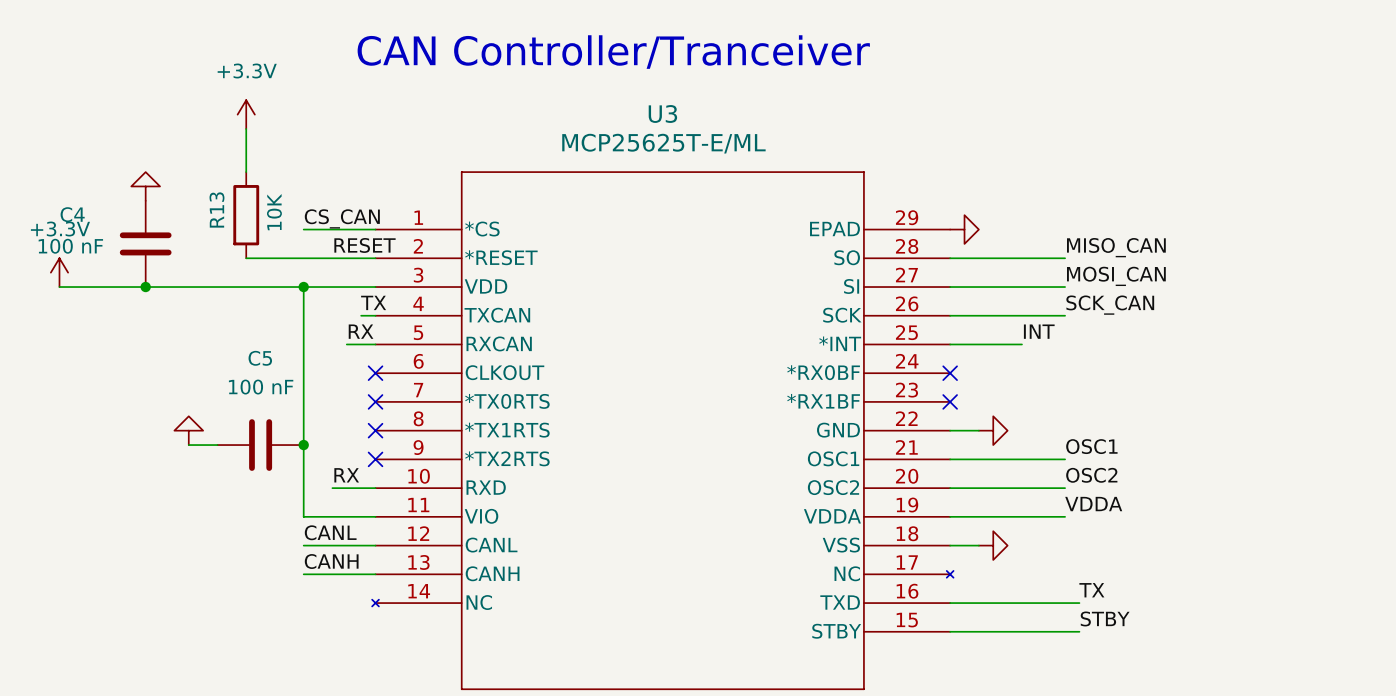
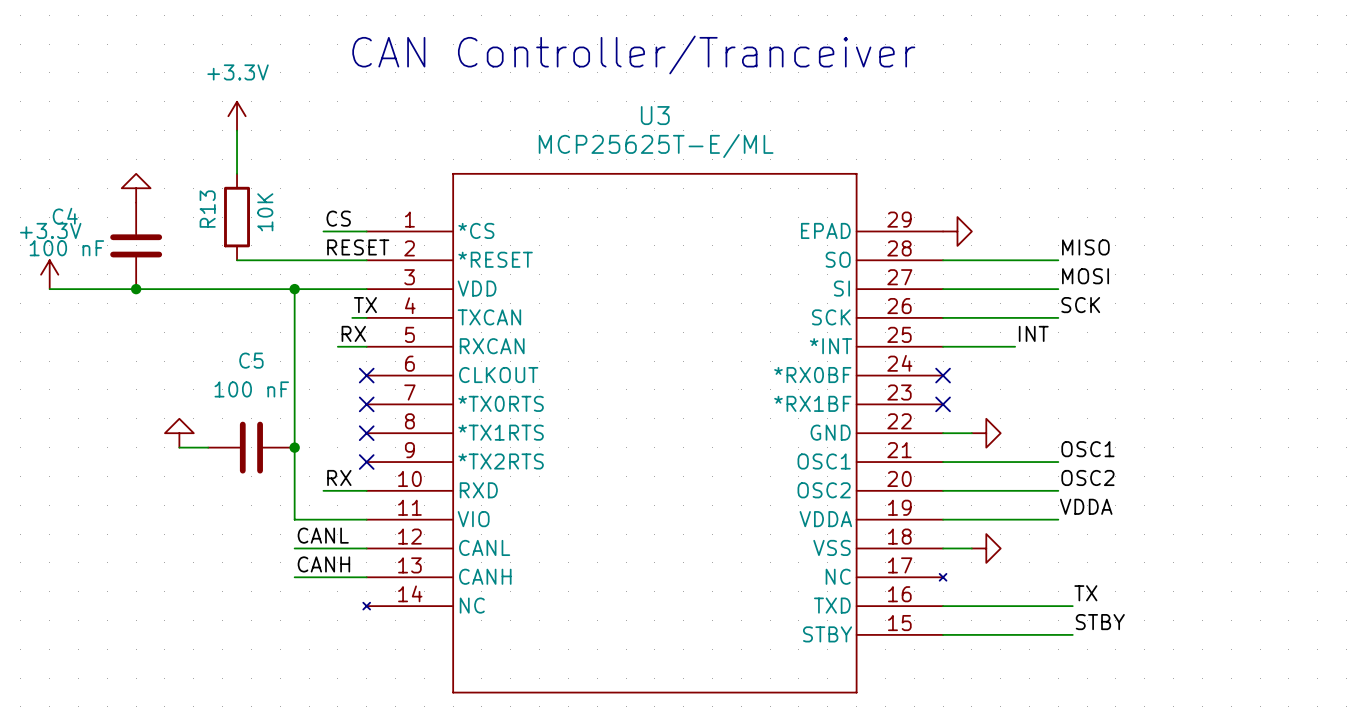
label: none -> CS (338, 218)
label: CS_CAN (342, 218) -> none
wire: (303, 229) (332, 229) -> none
label: MISO_CAN (1116, 247) -> MISO (1085, 247)
label: MOSI_CAN (1116, 276) -> MOSI (1085, 276)
label: SCK_CAN (1110, 305) -> SCK (1080, 305)

